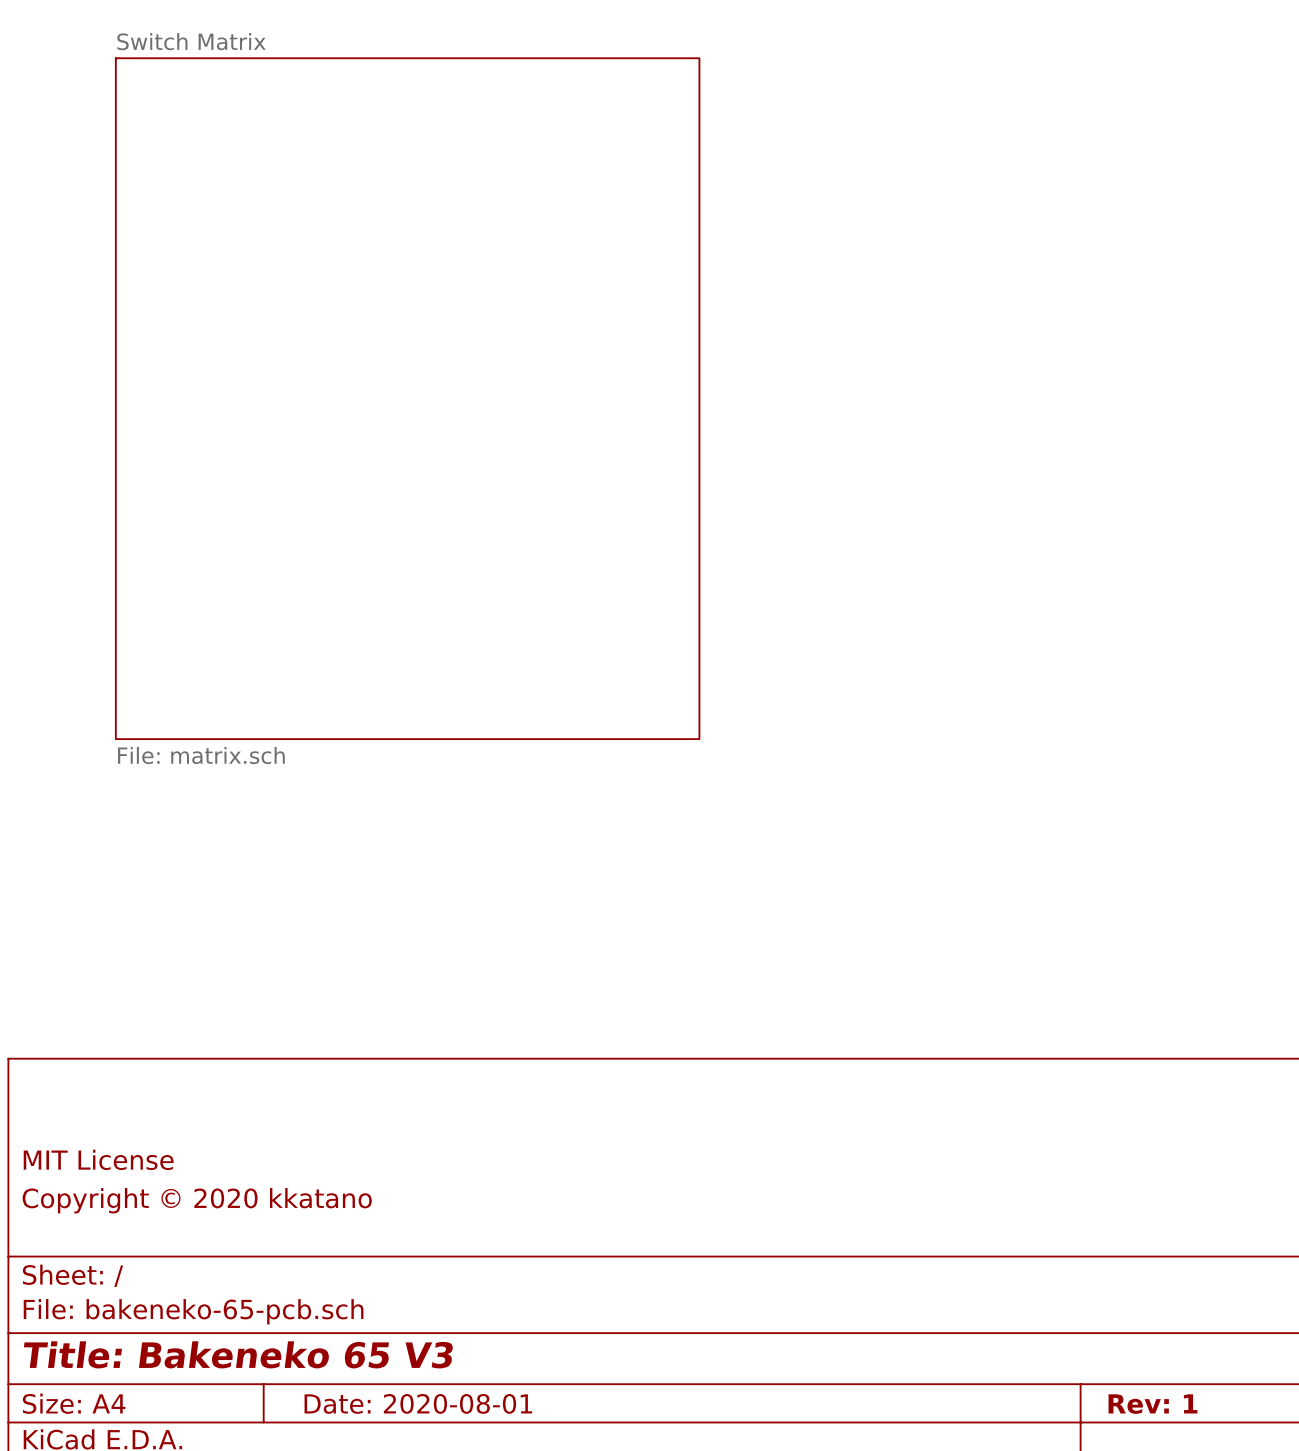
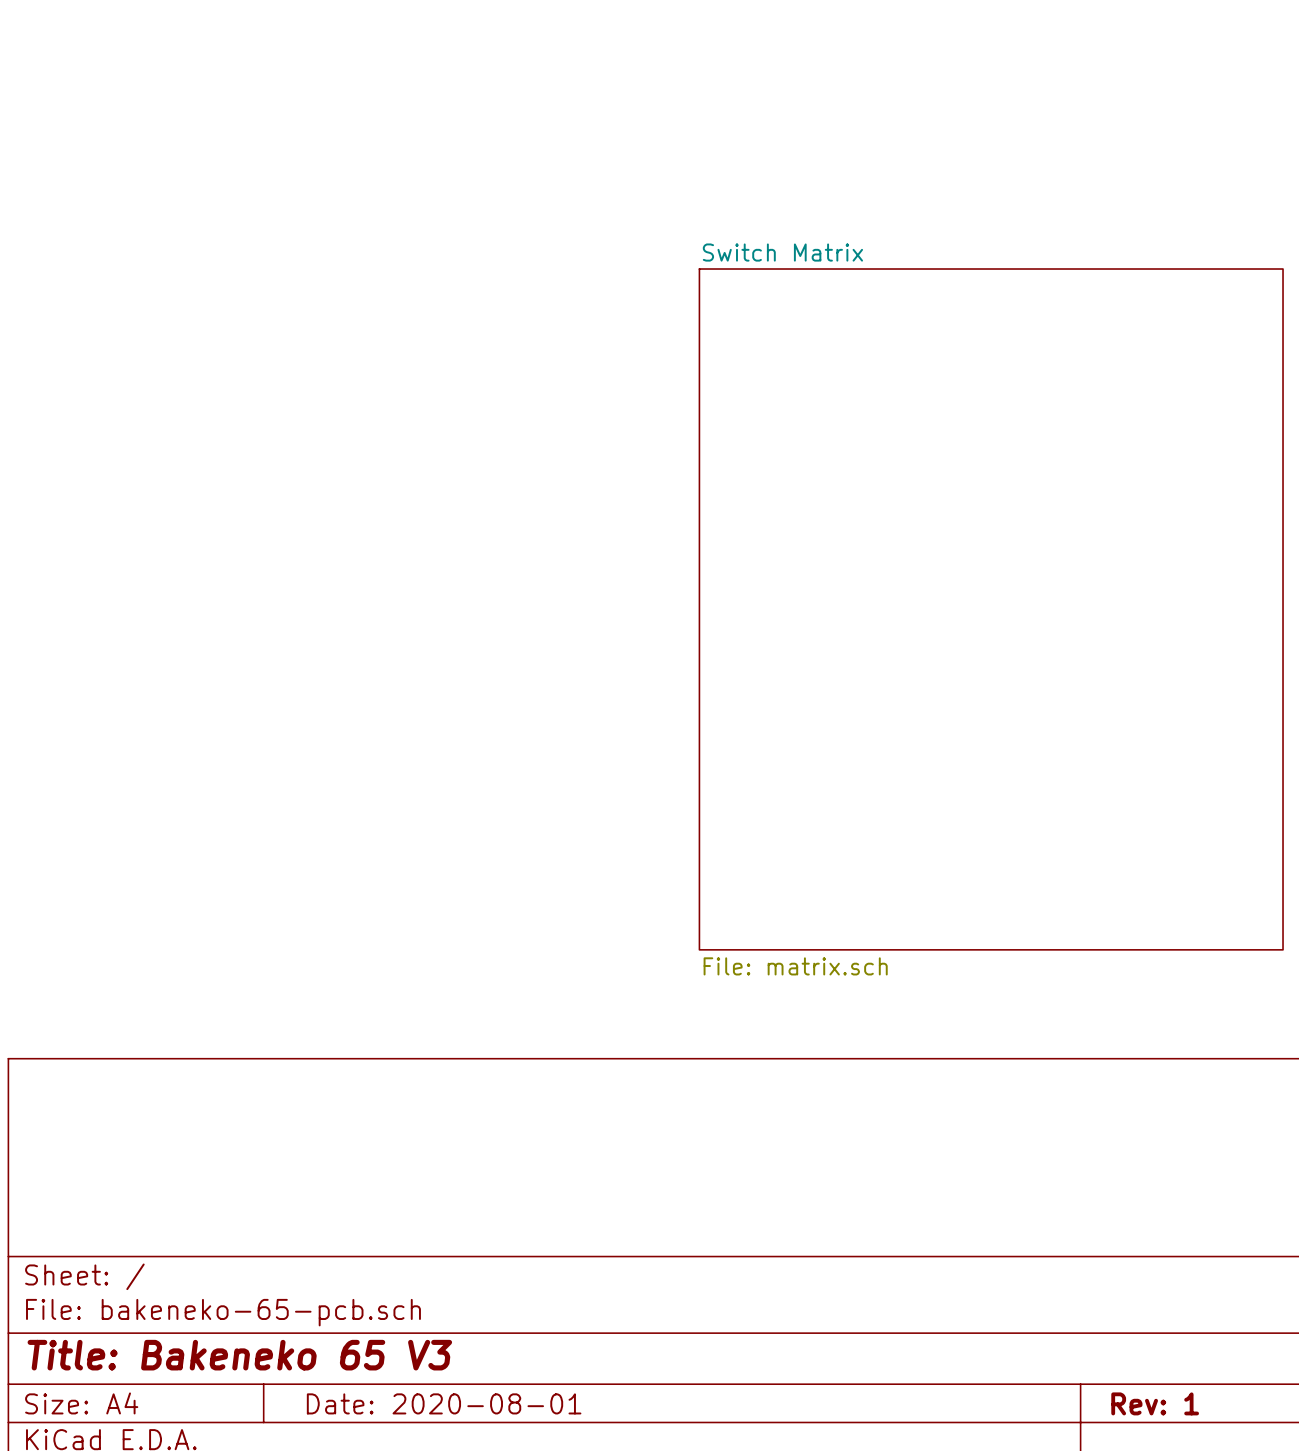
sheet Switch Matrix: File: matrix.sch (407, 398) -> none
sheet Switch Matrix: none -> File: matrix.sch (991, 609)
title block: MIT License (98, 1159) -> none
title block: Copyright © 2020 kkatano (197, 1200) -> none

